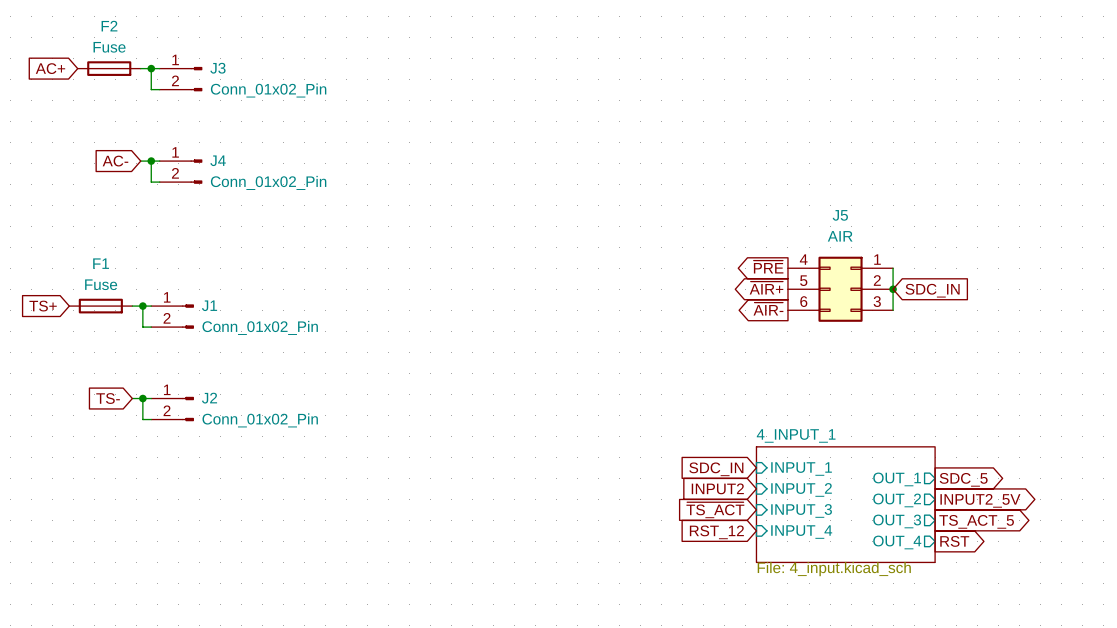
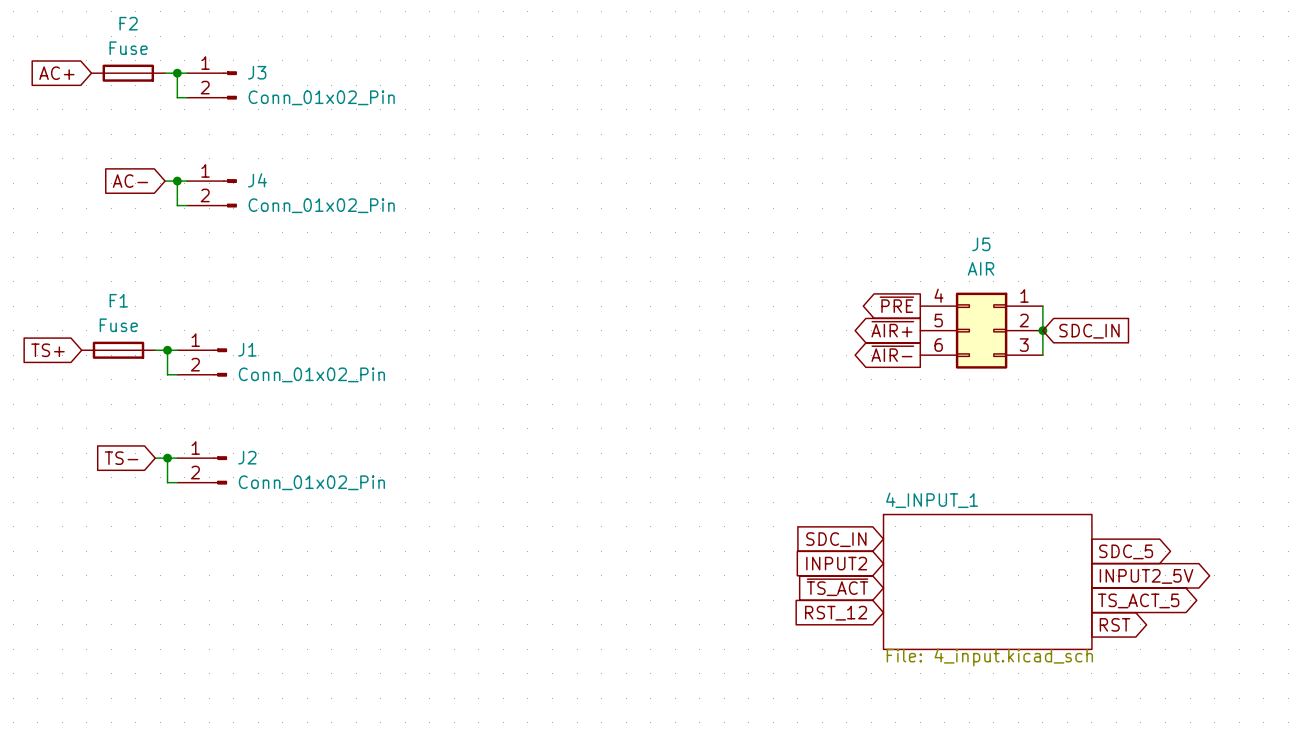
sheet pin: INPUT_1 (801, 468) -> none
sheet pin: OUT_1 (897, 479) -> none
sheet pin: INPUT_2 (801, 489) -> none
sheet pin: OUT_2 (897, 500) -> none
sheet pin: INPUT_3 (801, 510) -> none
sheet pin: OUT_3 (897, 521) -> none
sheet pin: INPUT_4 (801, 532) -> none
sheet pin: OUT_4 (897, 542) -> none

